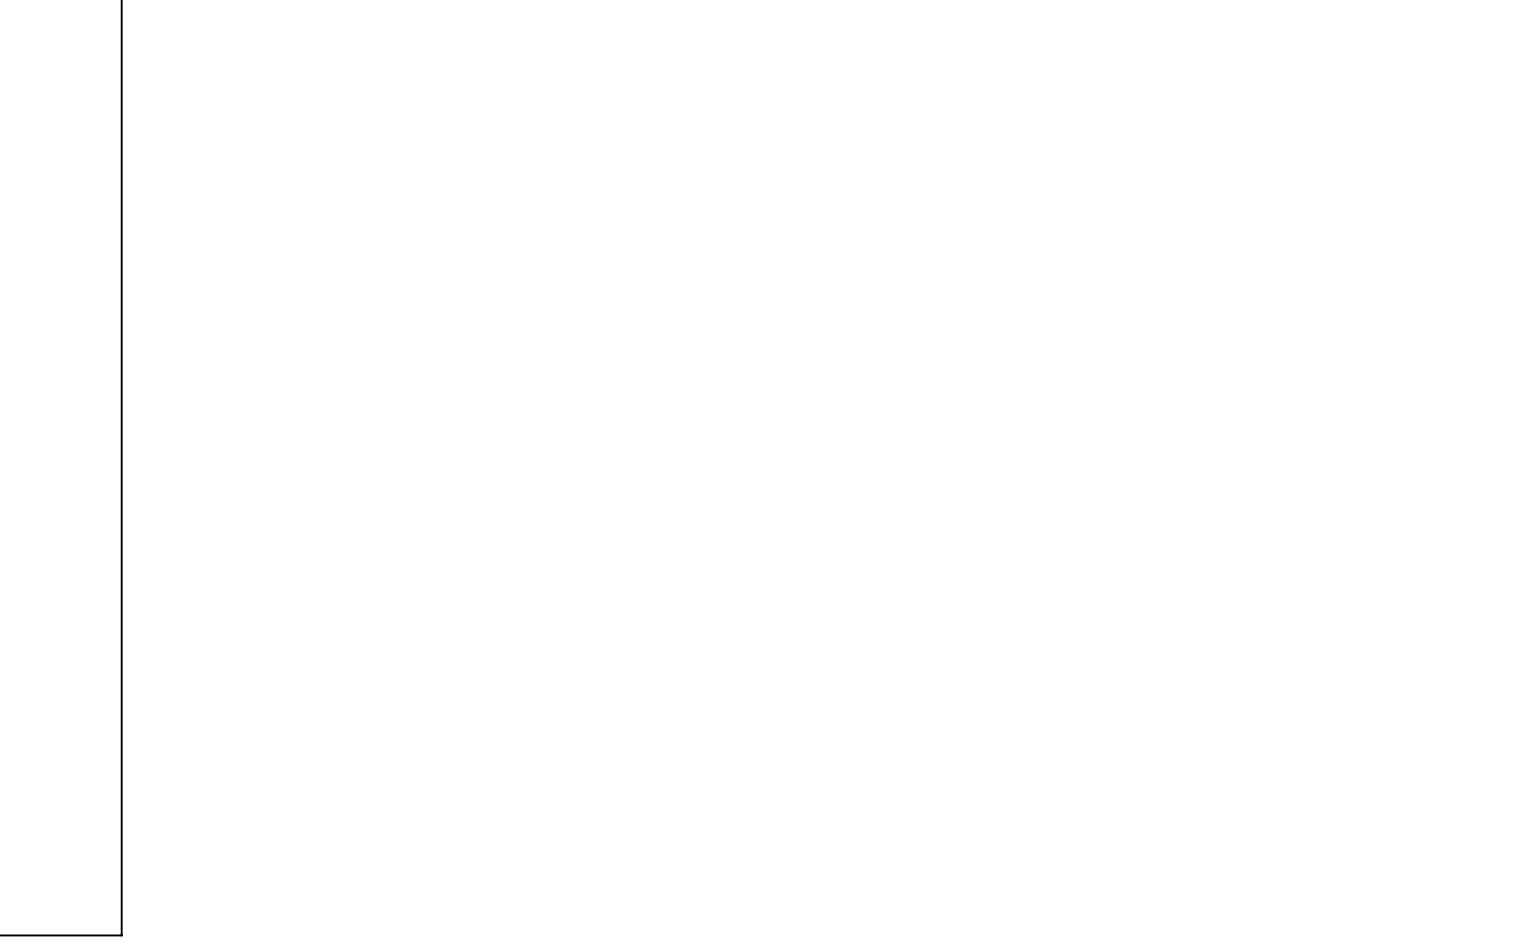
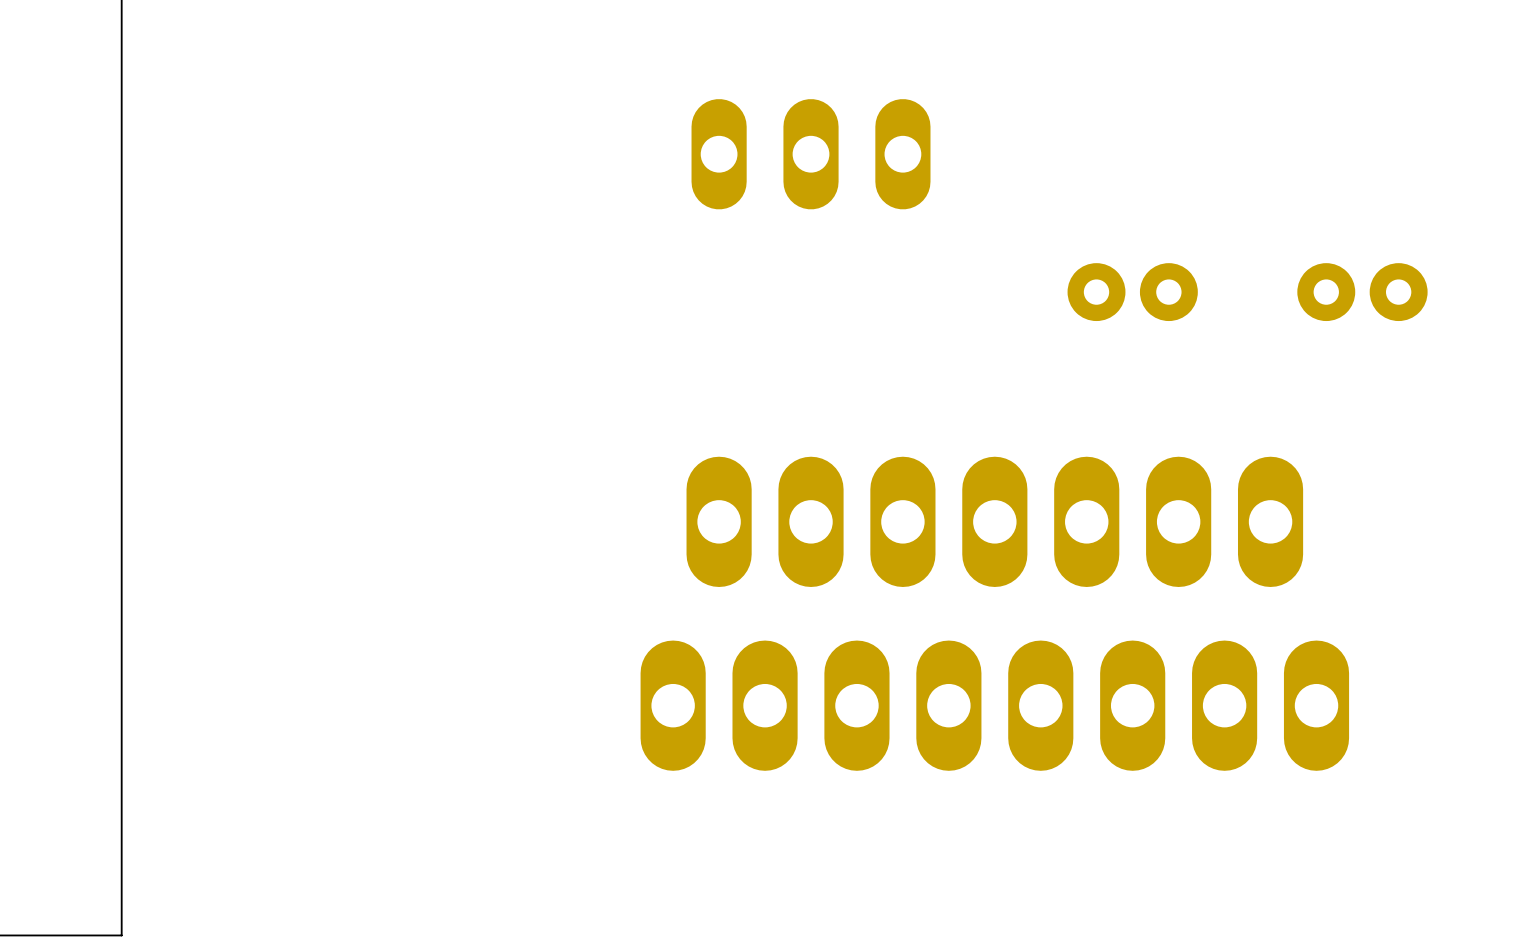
part: none -> (811, 154)
part: none -> (1132, 292)
part: none -> (1362, 292)
part: none -> (994, 613)

